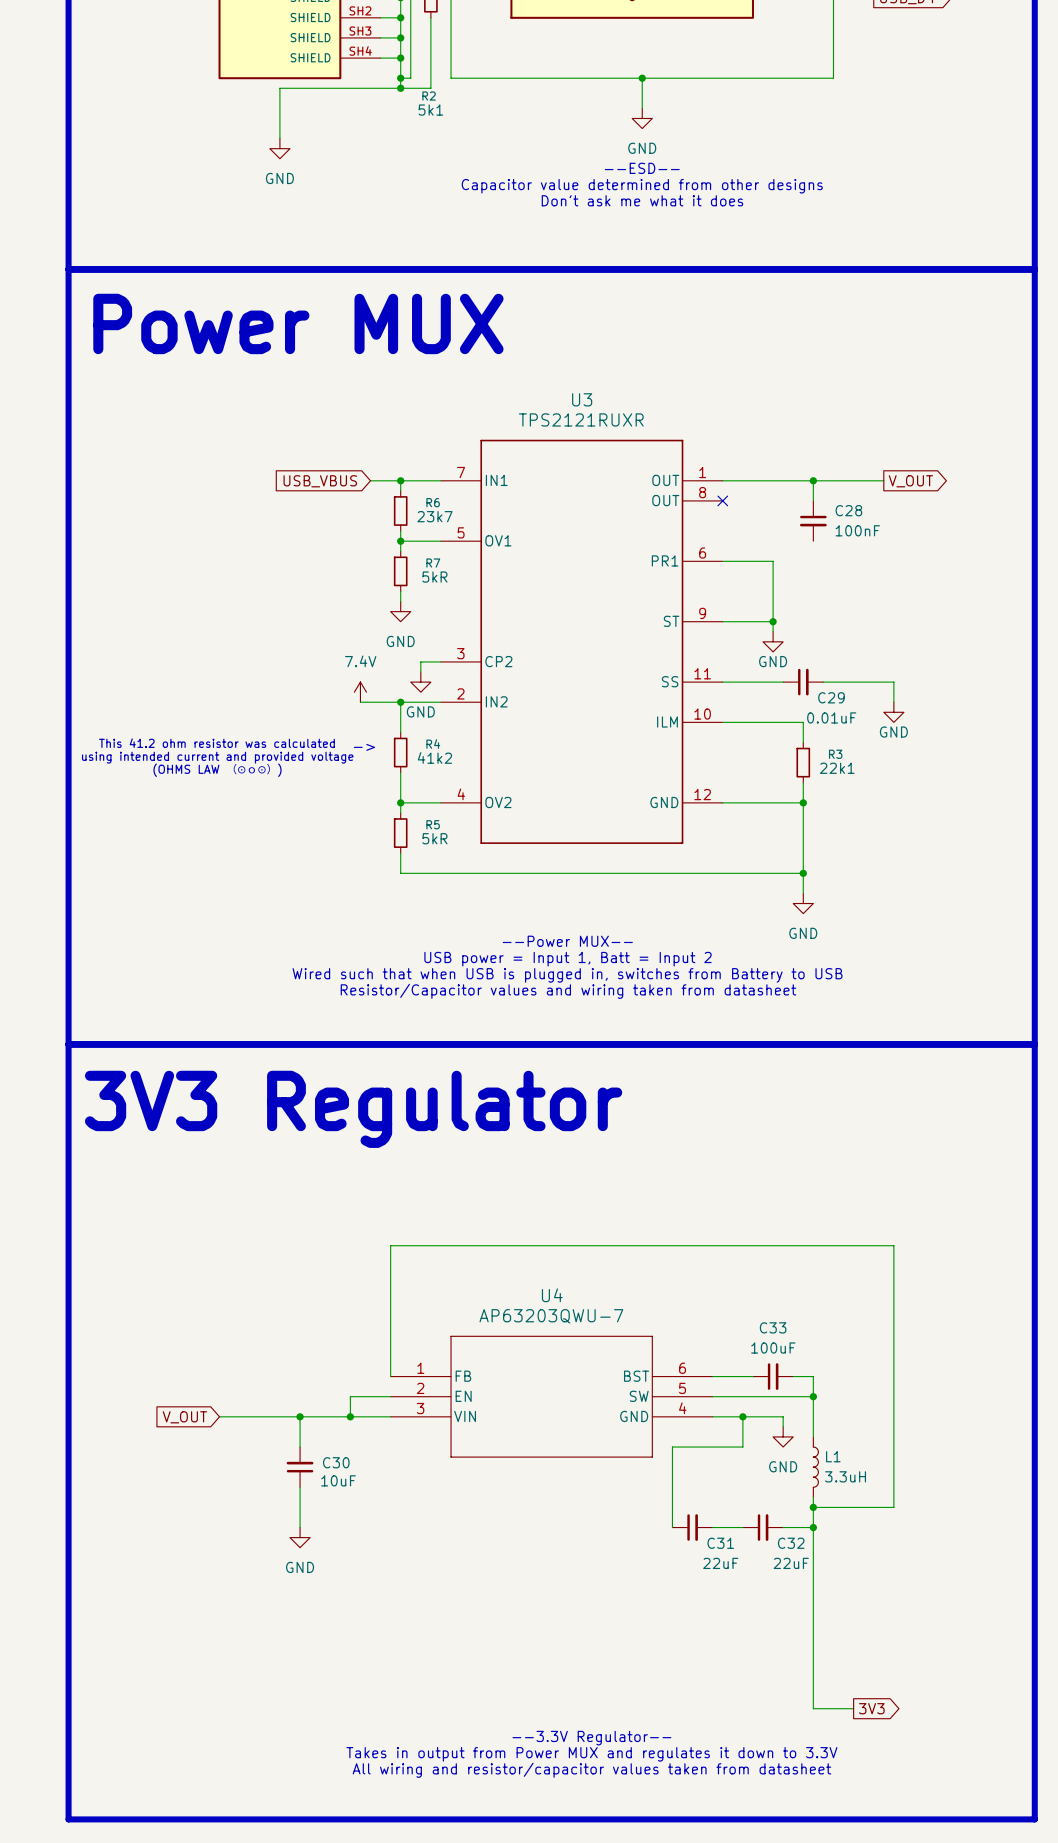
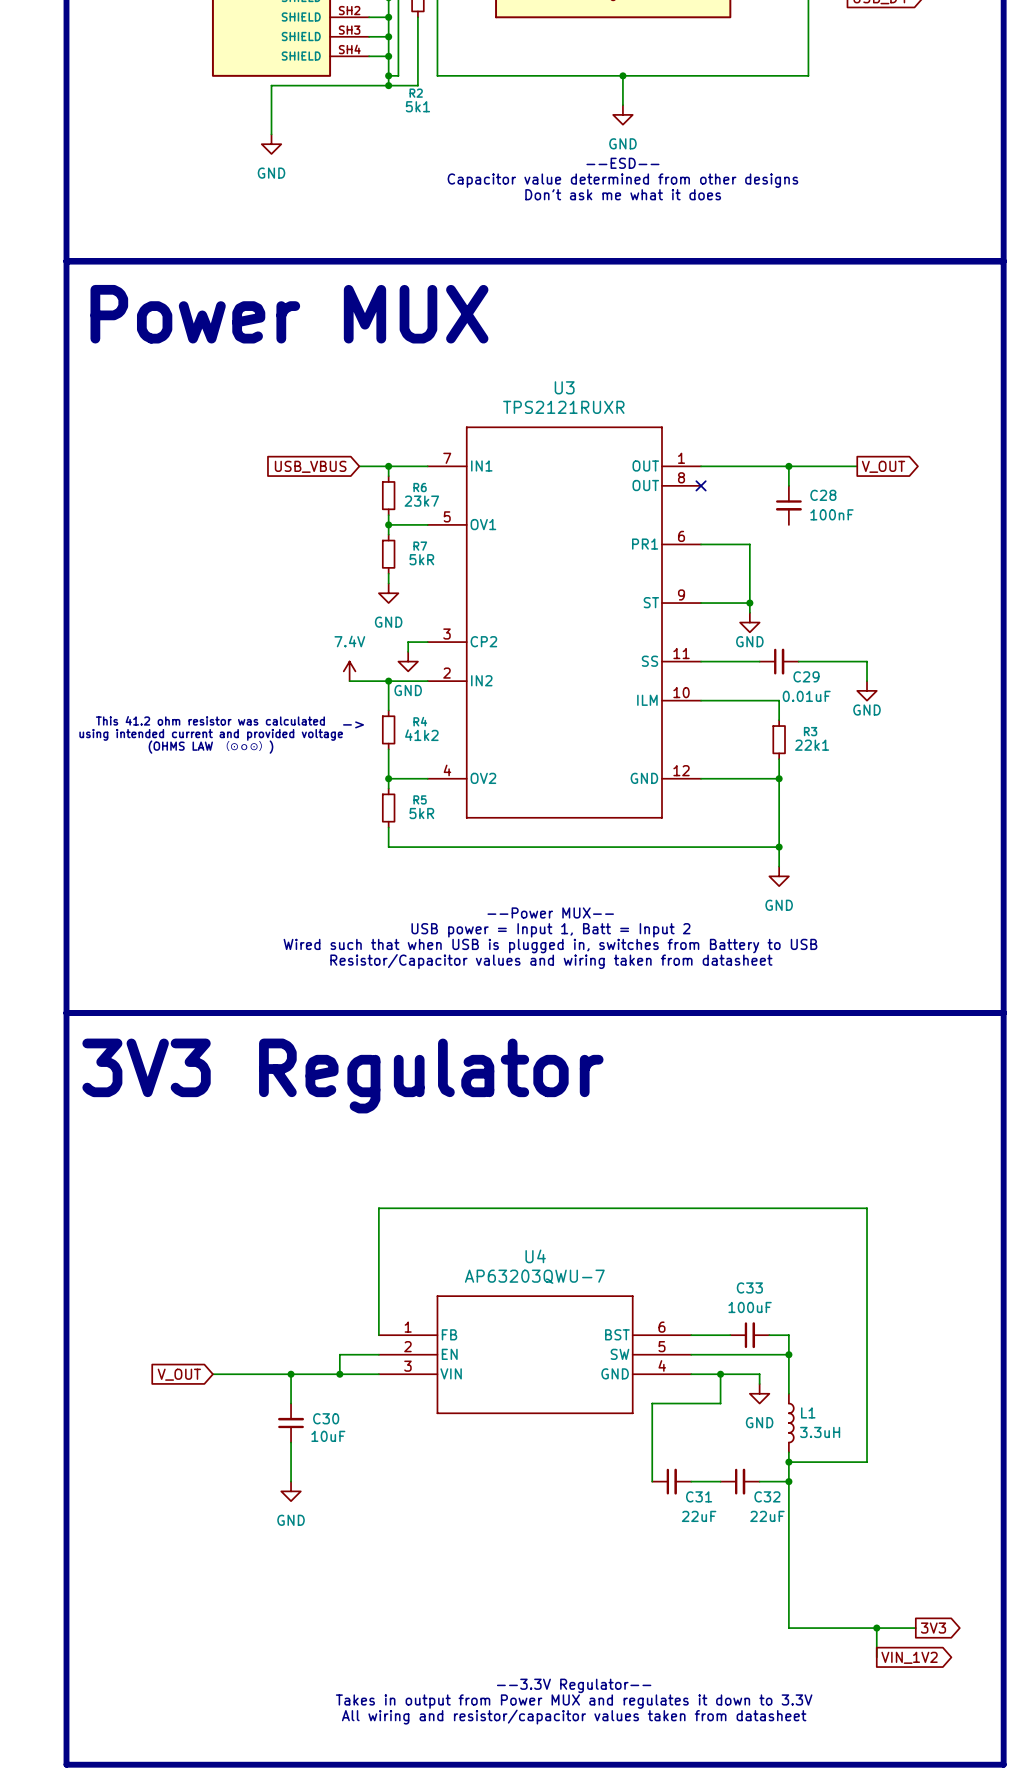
wire: (813, 1678) (813, 1708) (853, 1708) -> (788, 1628) (915, 1628)
wire: none -> (876, 1628) (876, 1657)
junction: none -> (876, 1628)
global label position: 3V3 (871, 1708) -> 3V3 (933, 1628)
global label: none -> VIN_1V2 (909, 1657)

